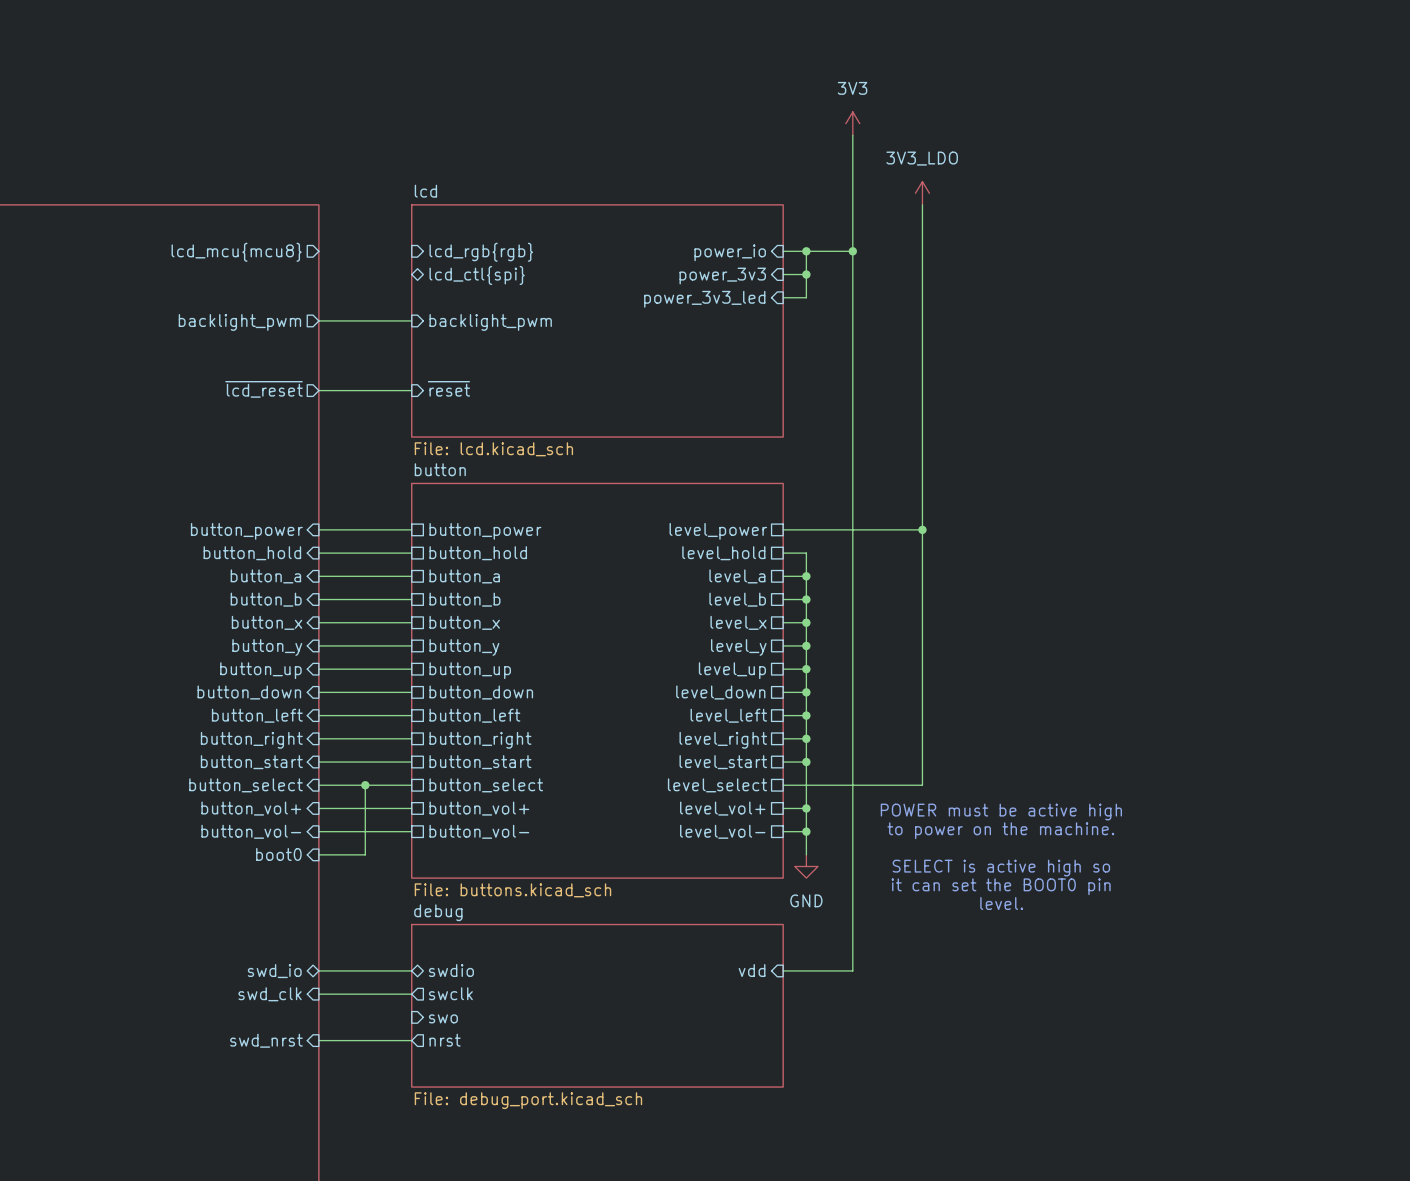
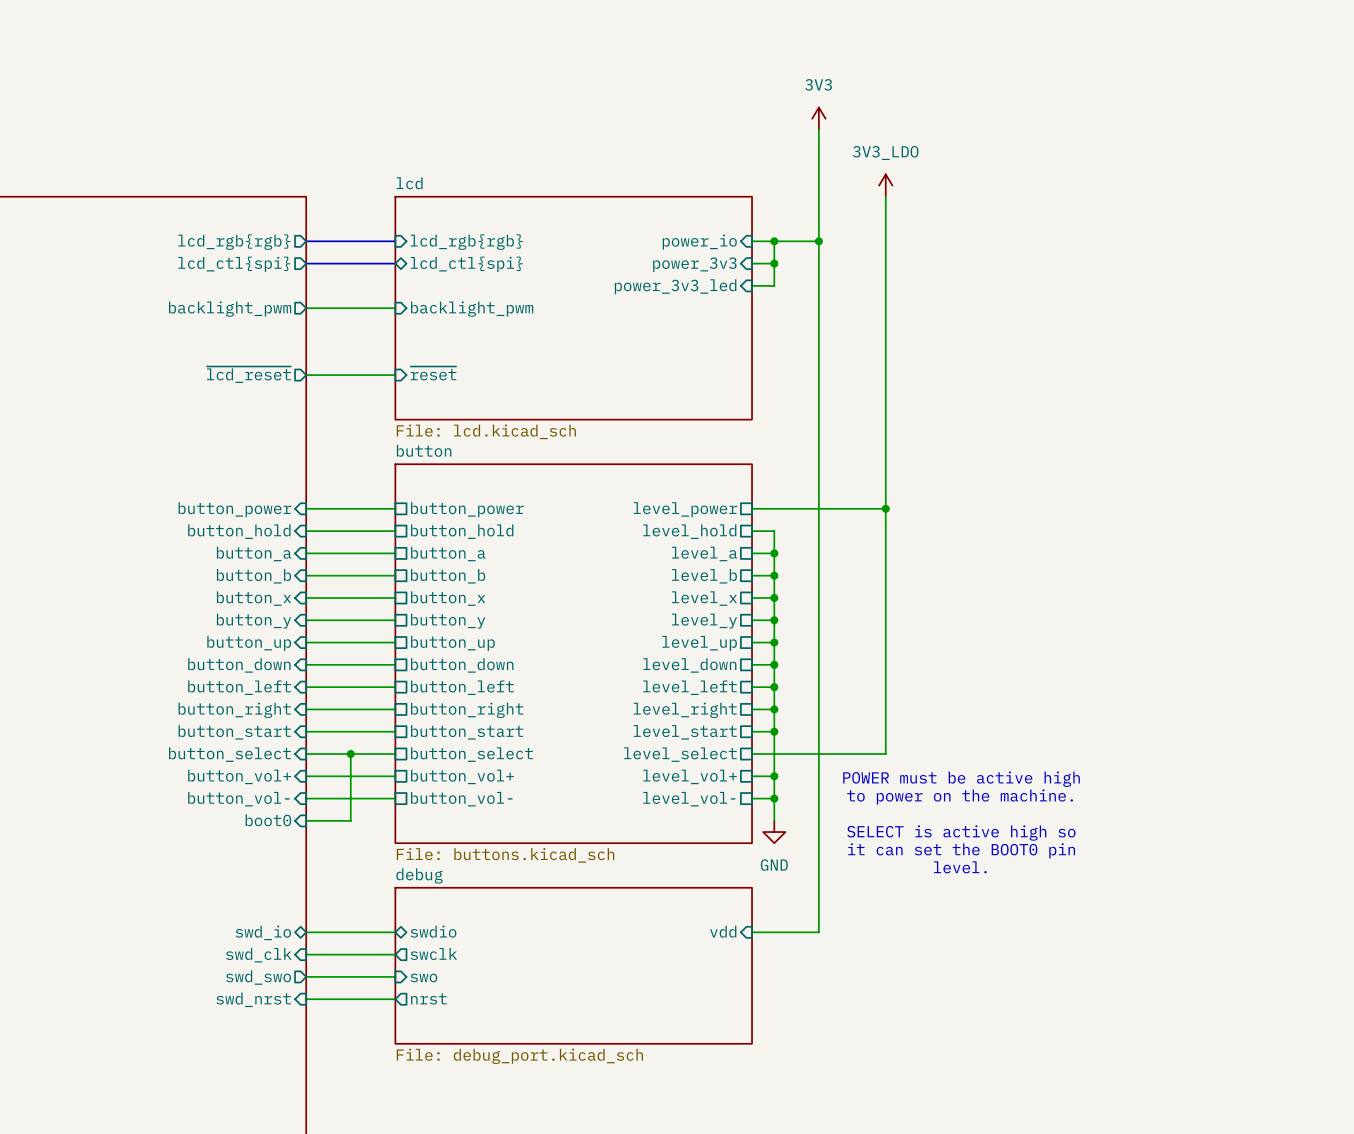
bus: none -> (306, 241) (395, 241)
sheet pin: lcd_mcu{mcu8} (236, 252) -> lcd_rgb{rgb} (234, 242)
bus: none -> (306, 263) (395, 263)
sheet pin: none -> lcd_ctl{spi} (234, 264)
sheet pin: none -> swd_swo (258, 977)
wire: none -> (306, 976) (395, 976)

